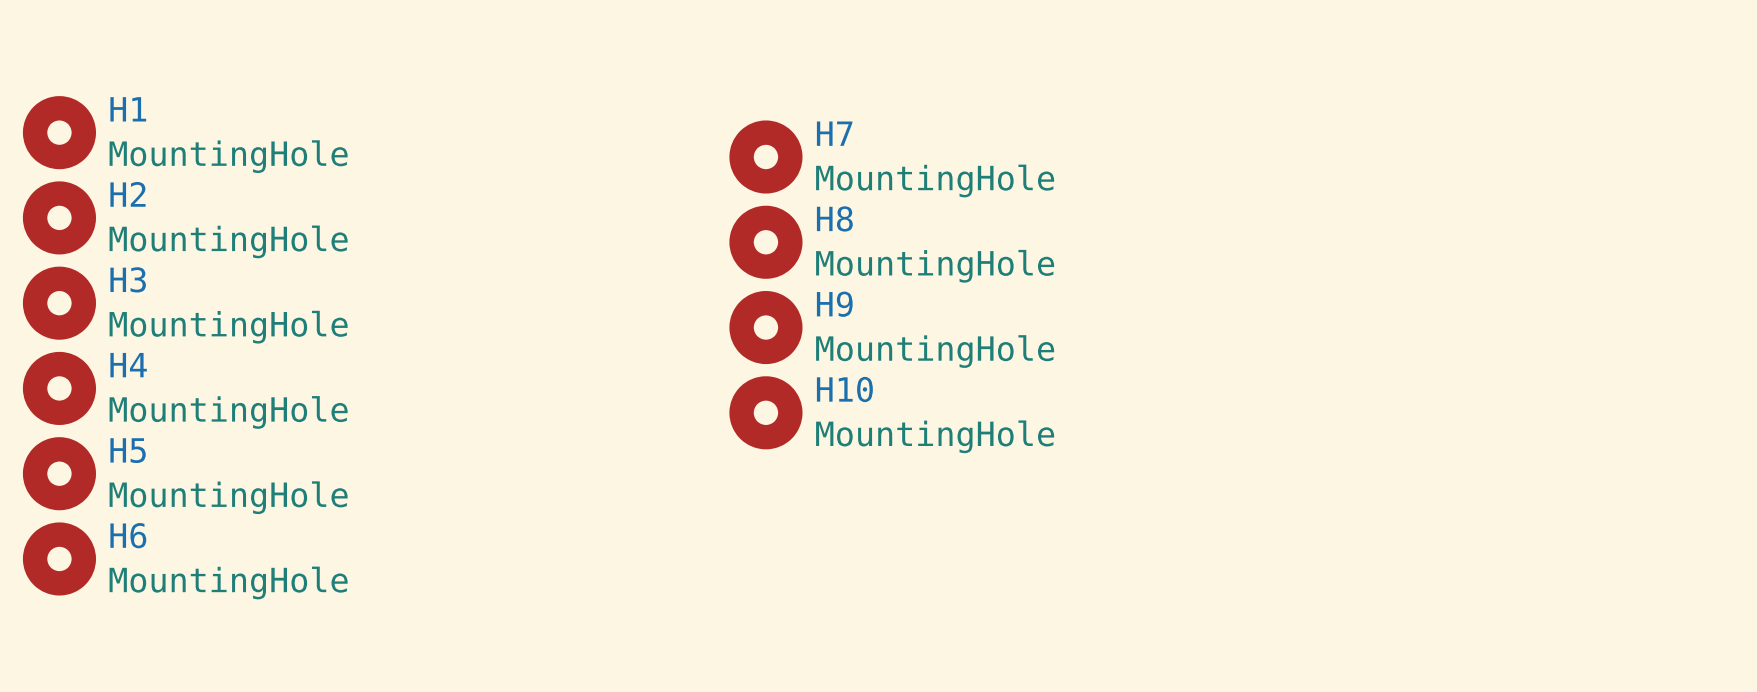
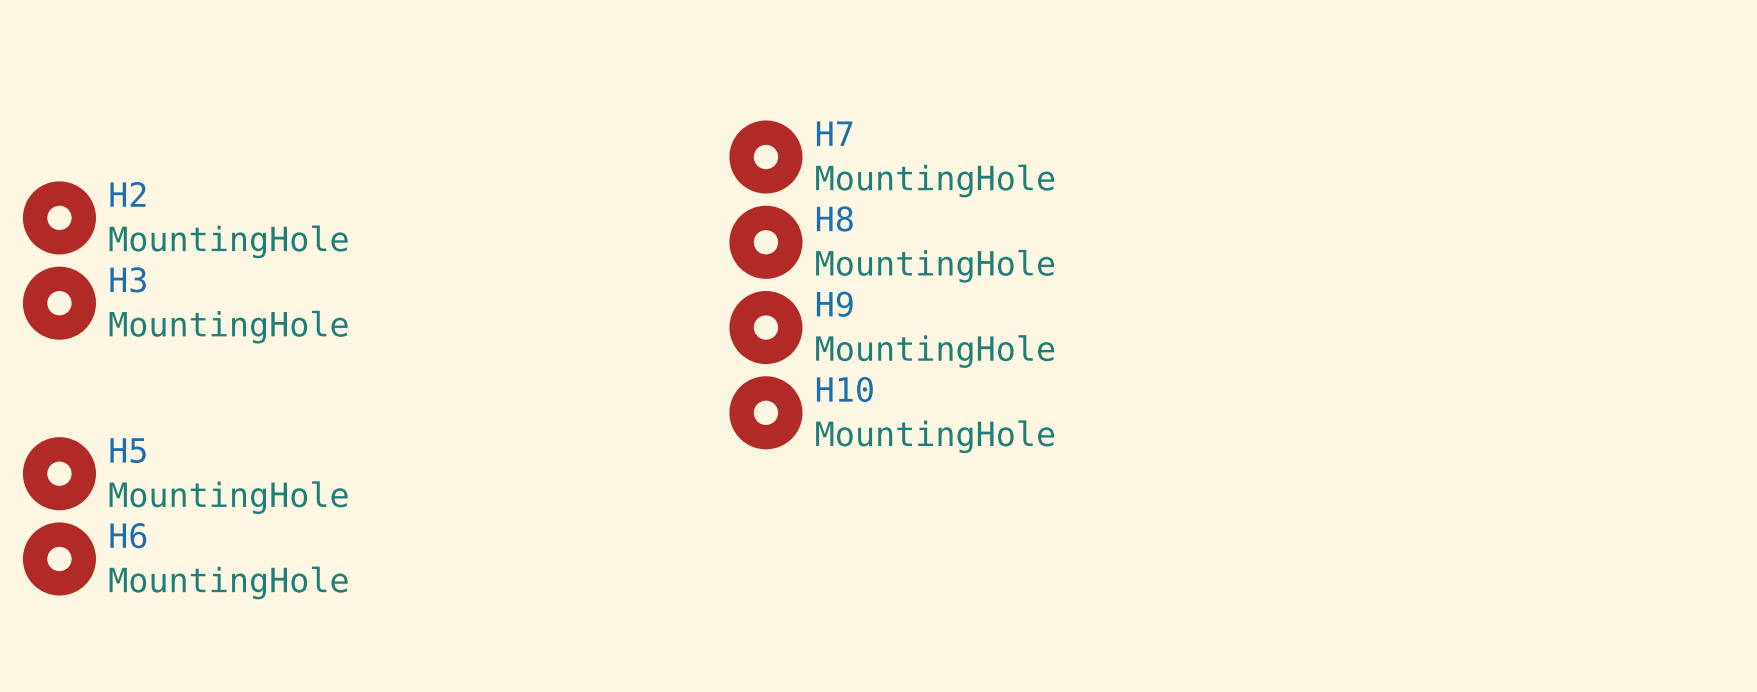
H1: MountingHole (59, 132) -> none
H4: MountingHole (59, 388) -> none

